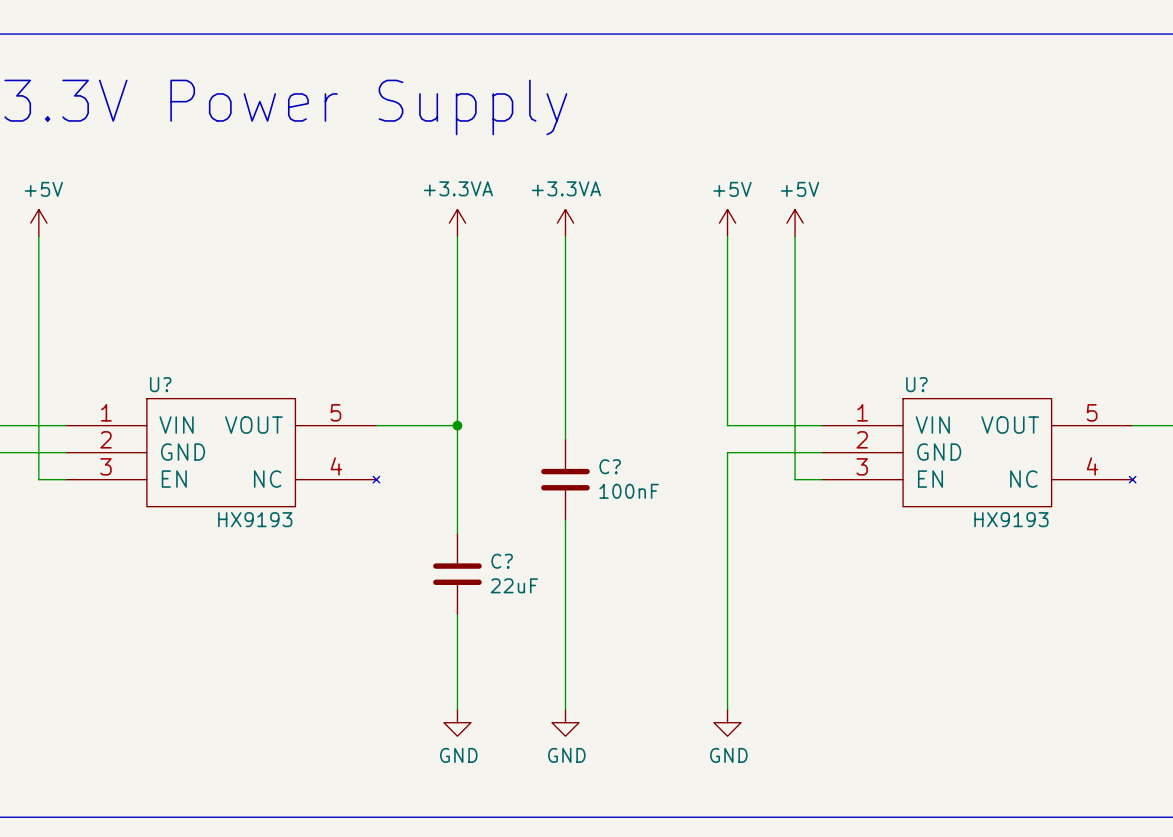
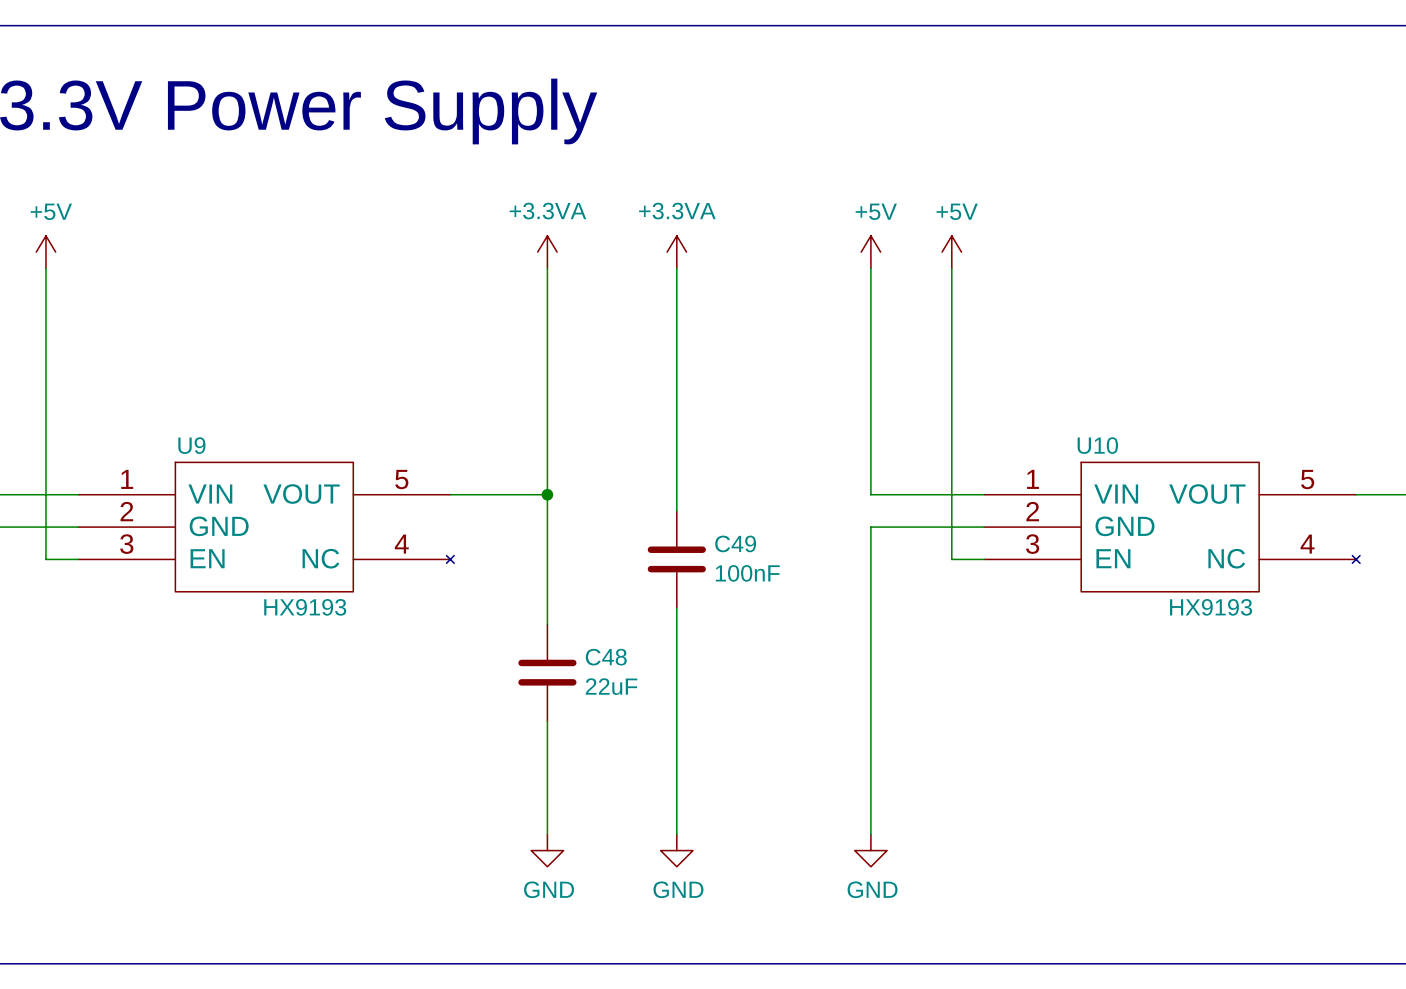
U? name: U? (160, 384) -> U9 (191, 445)
U? name: U? (916, 384) -> U10 (1097, 445)
C? name: C? (610, 466) -> C49 (735, 543)
C? name: C? (502, 561) -> C48 (606, 657)

